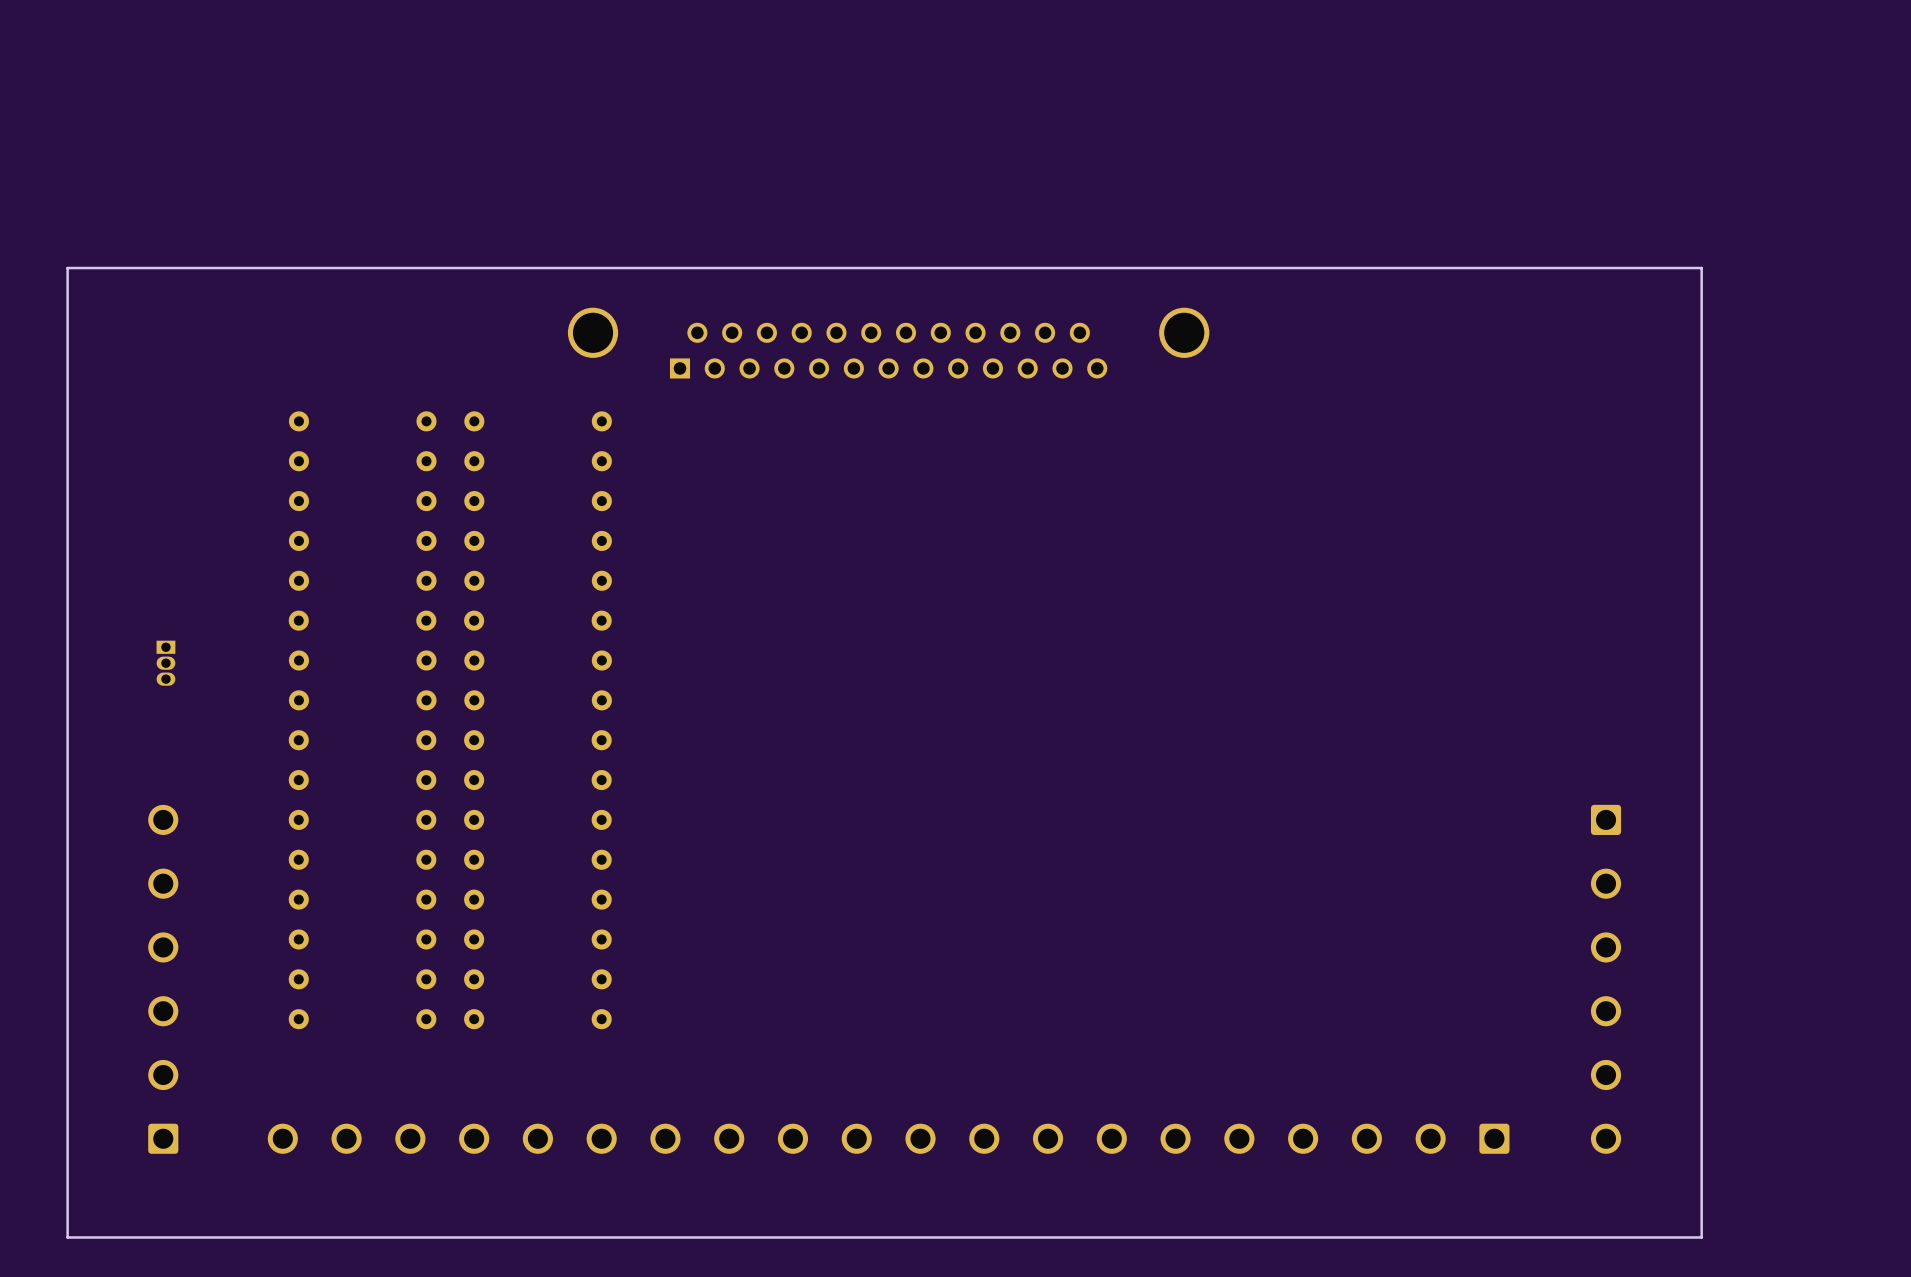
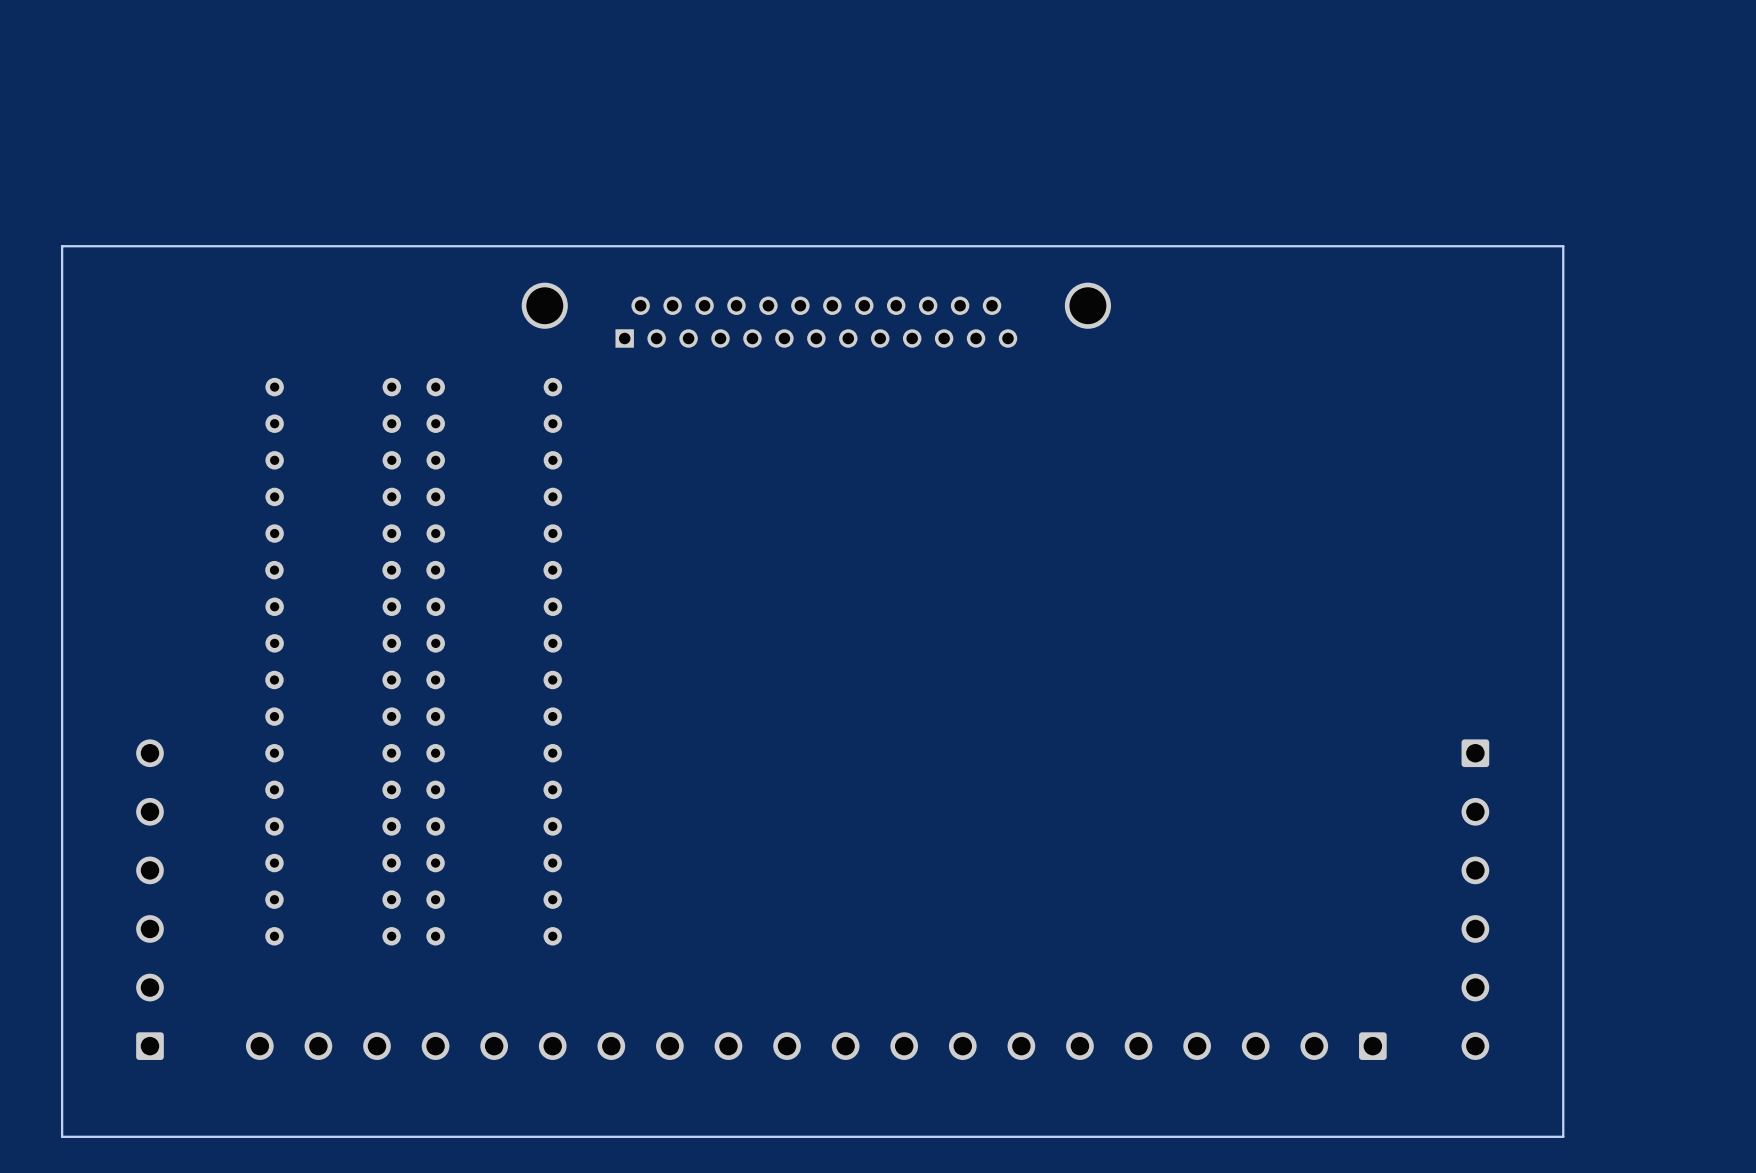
part: (165, 663) -> none

